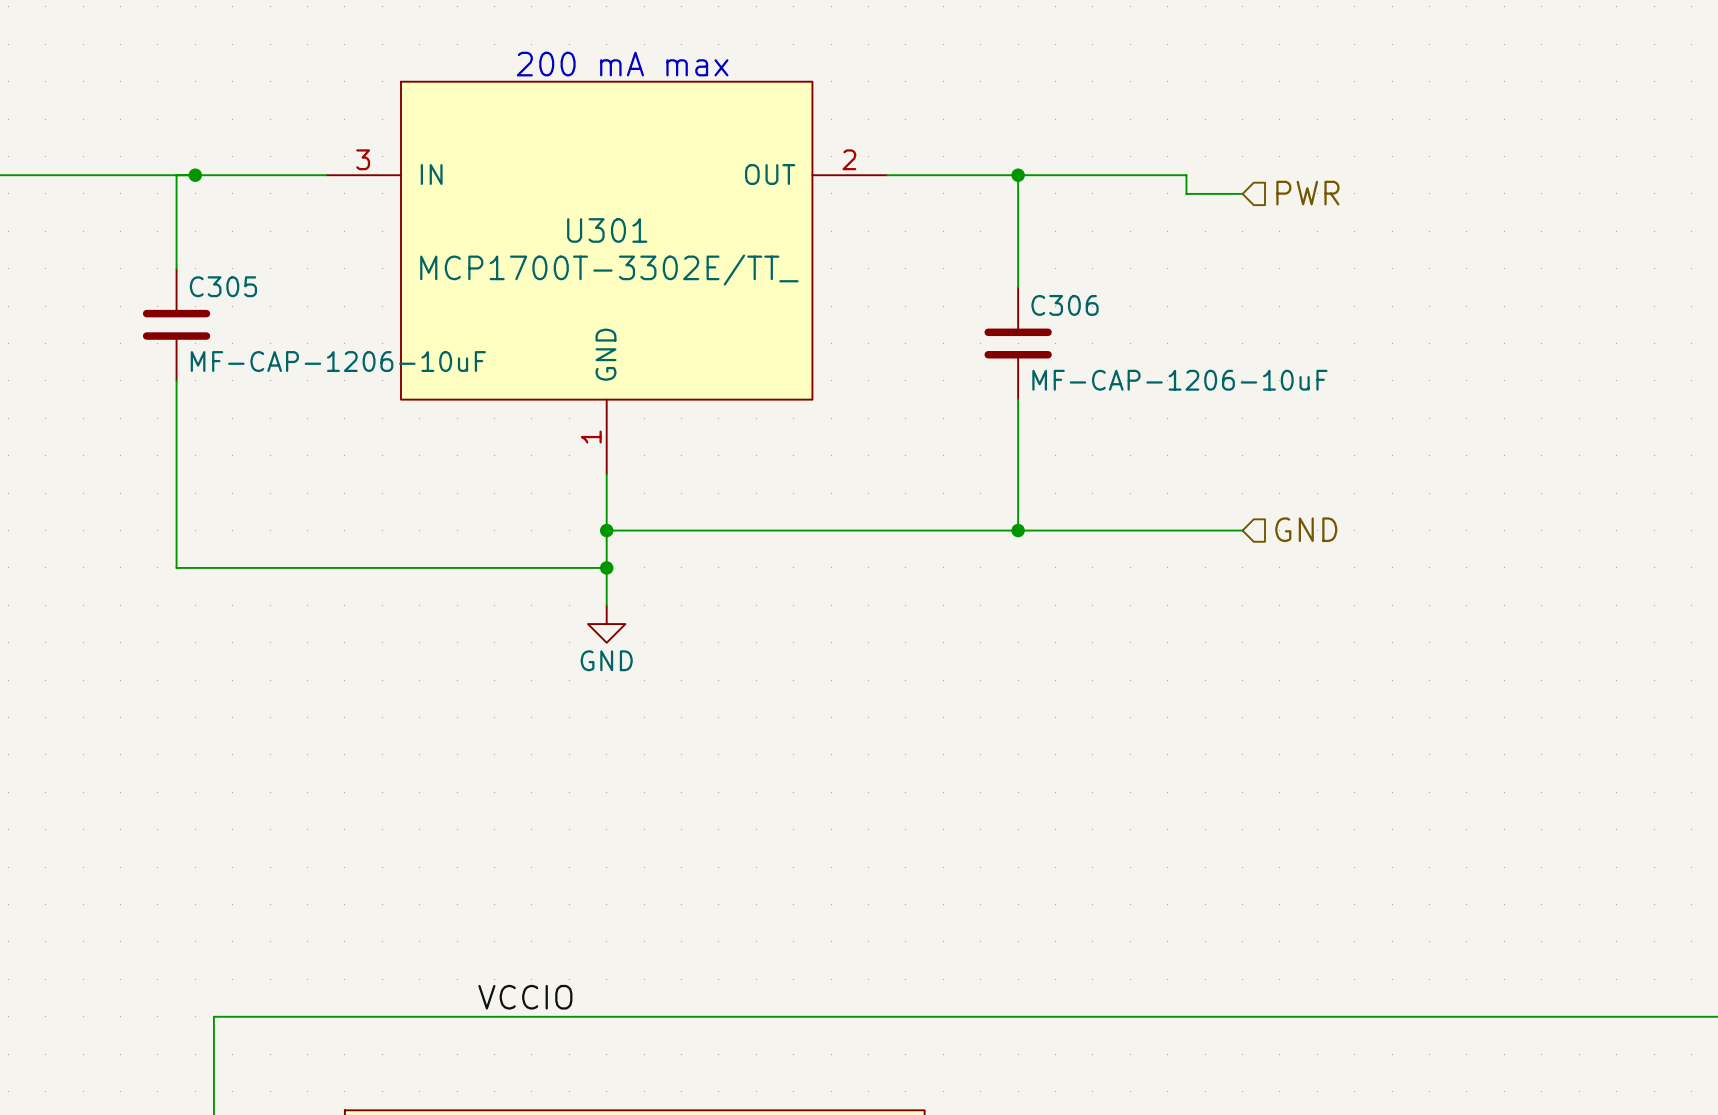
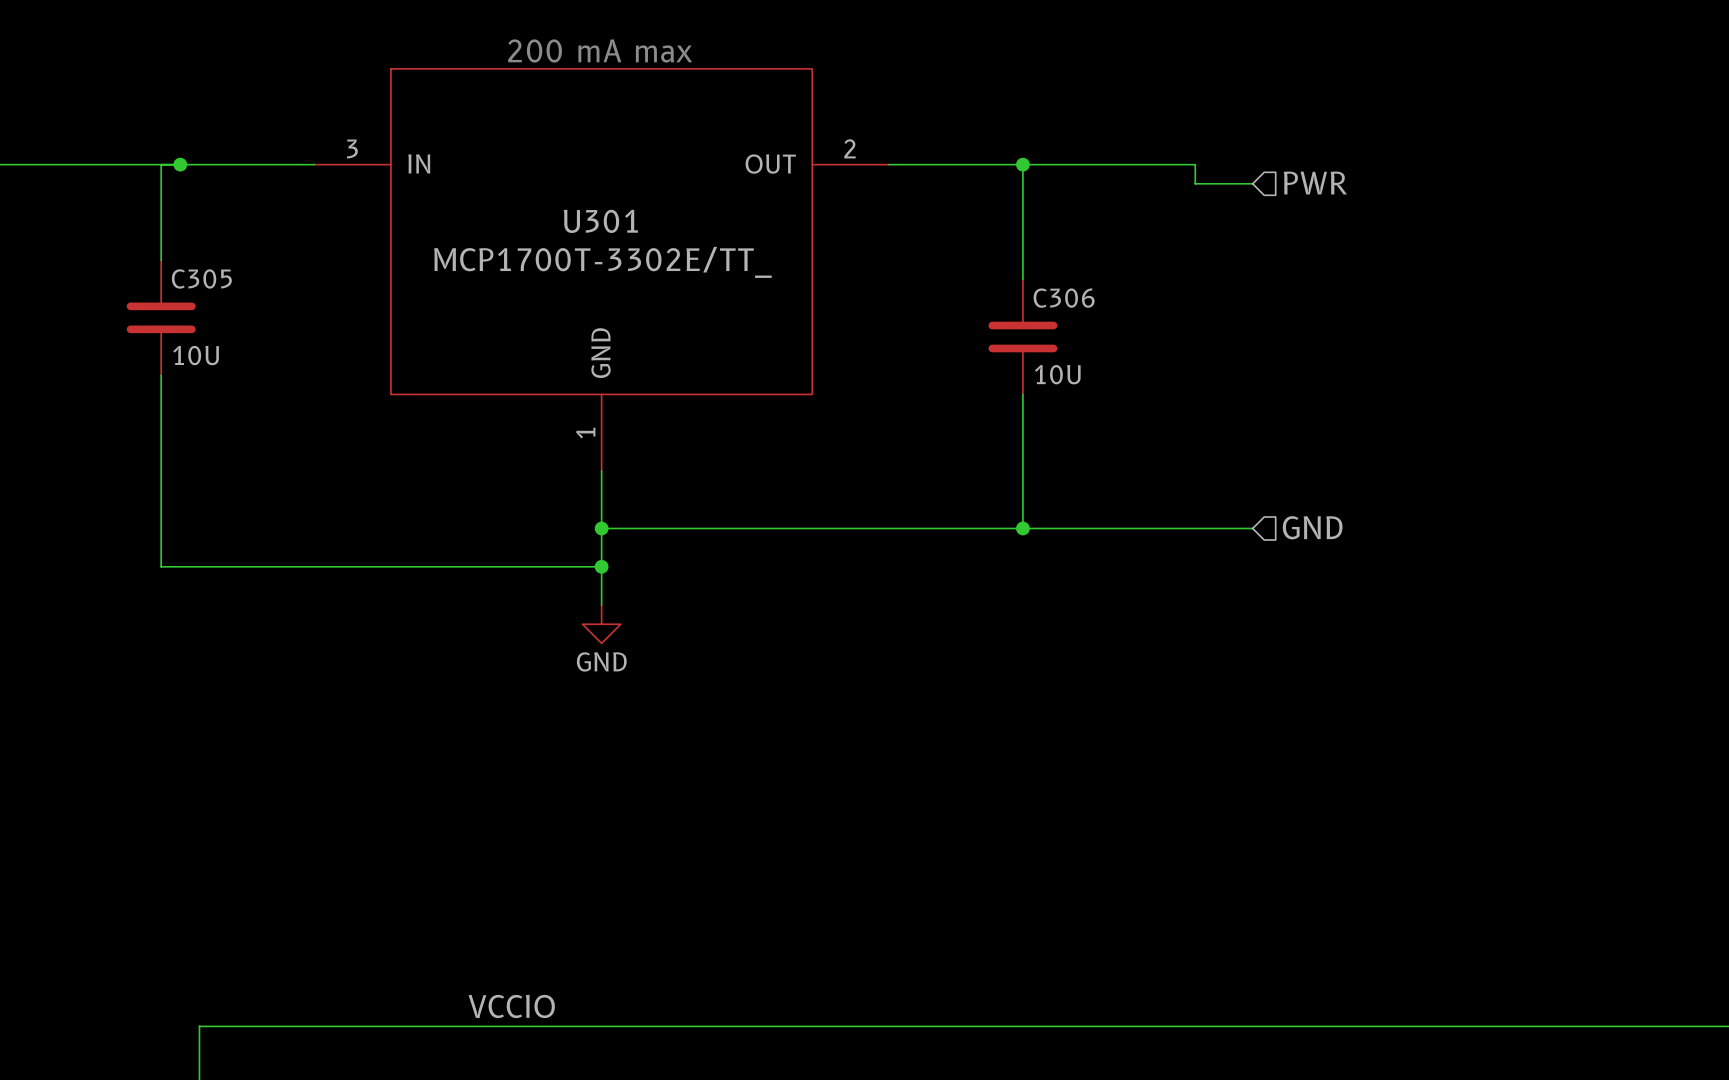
C305 value: MF-CAP-1206-10uF (338, 361) -> 10U (196, 355)
C306 value: MF-CAP-1206-10uF (1179, 380) -> 10U (1057, 374)

